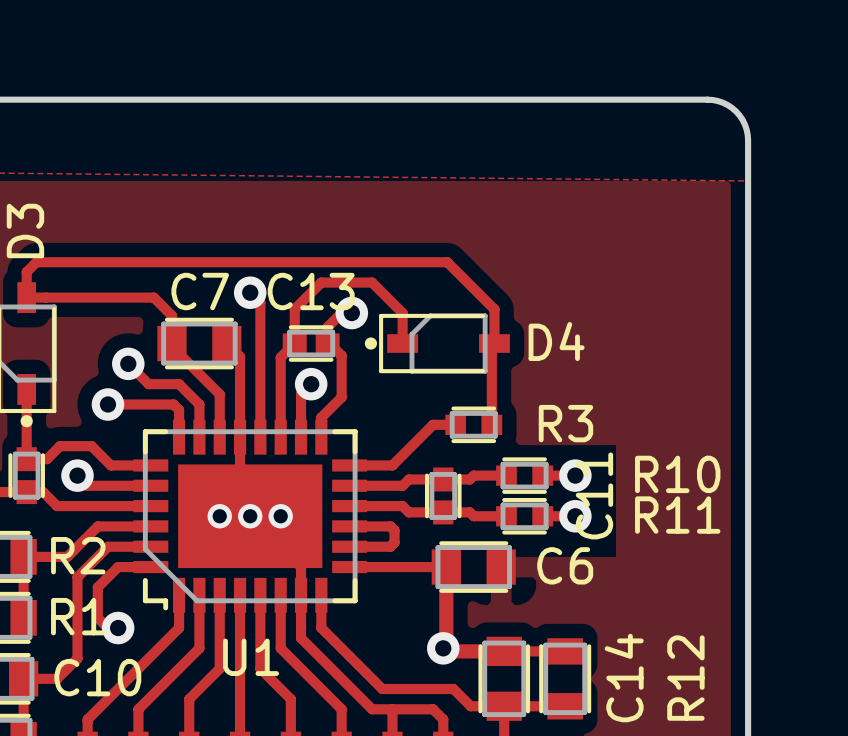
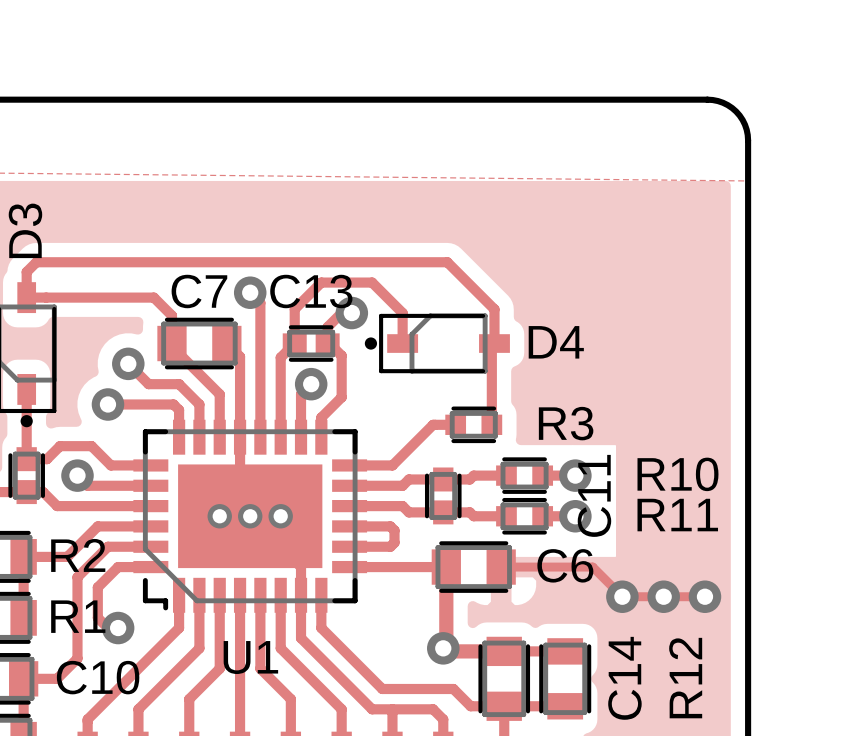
top track: none -> (501, 567) (592, 567) (622, 596) (704, 596)
via: none -> (622, 596)
via: none -> (663, 596)
via: none -> (704, 596)

